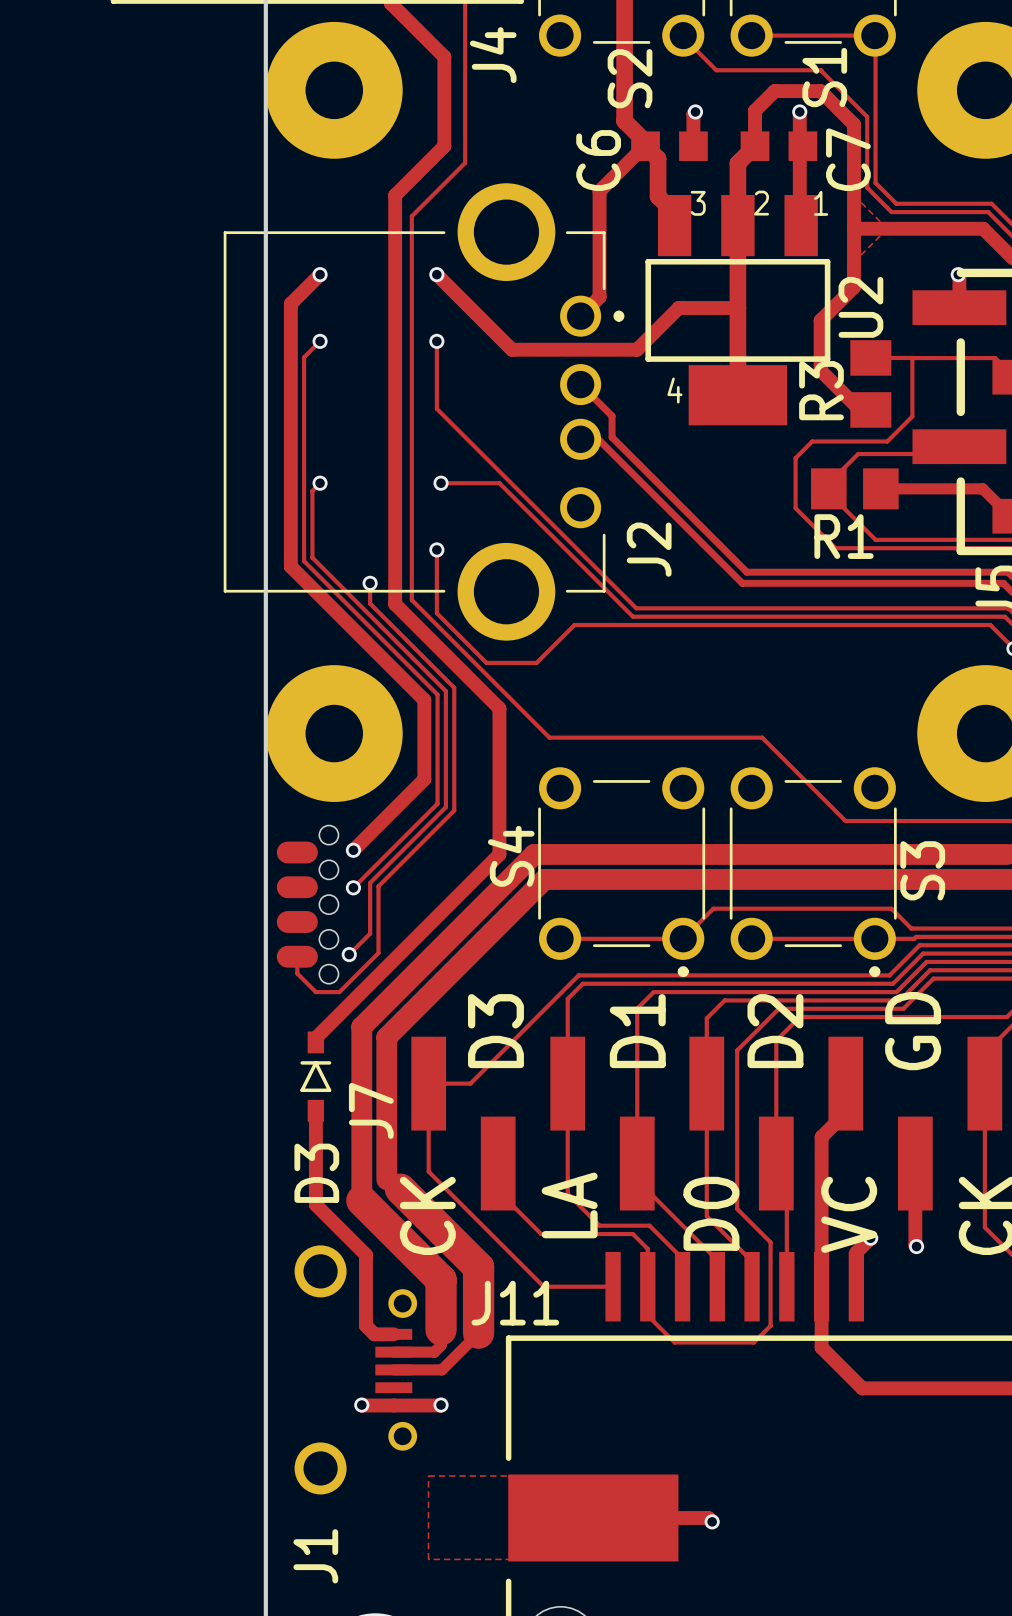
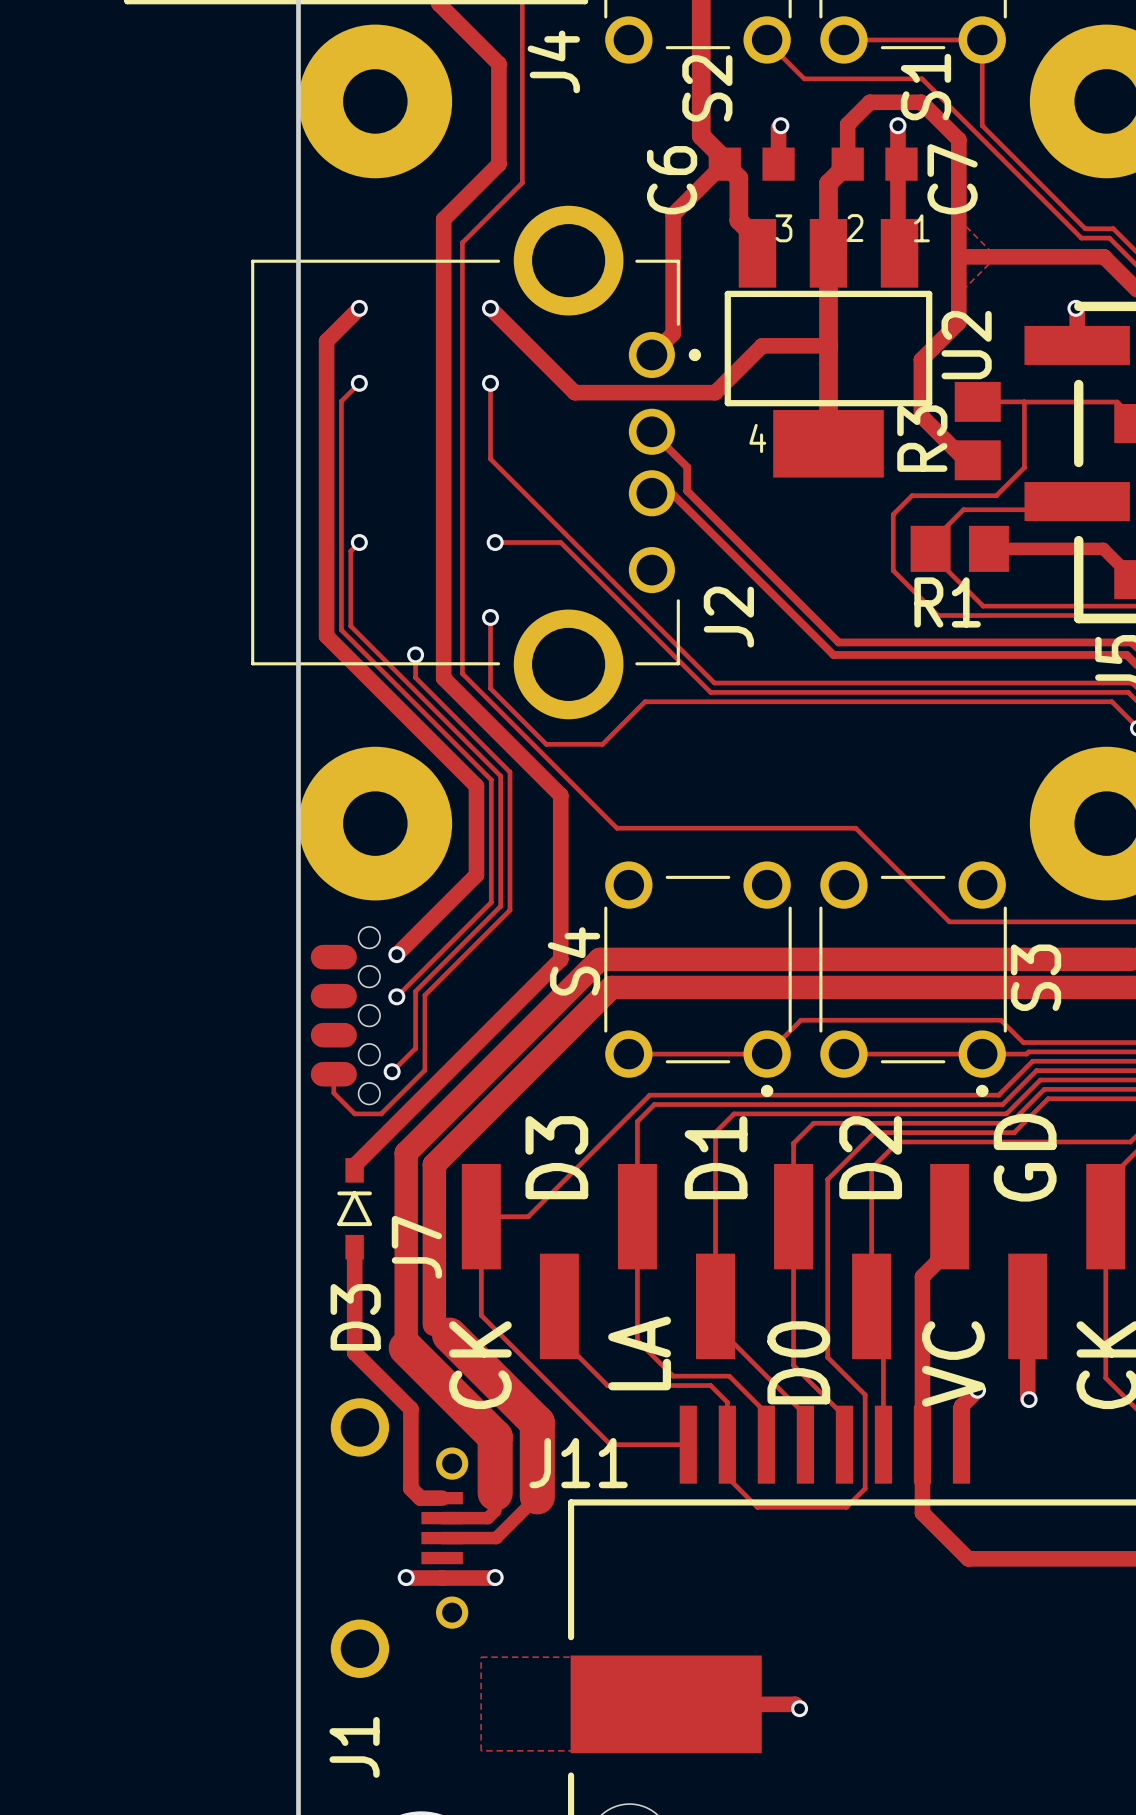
track: (874, 35) (875, 182) (896, 203) (966, 203) -> (982, 39) (982, 125) (1085, 228)
track: (820, 70) (867, 116) (867, 187) (891, 212) (963, 212) -> (922, 78) (1081, 238)

